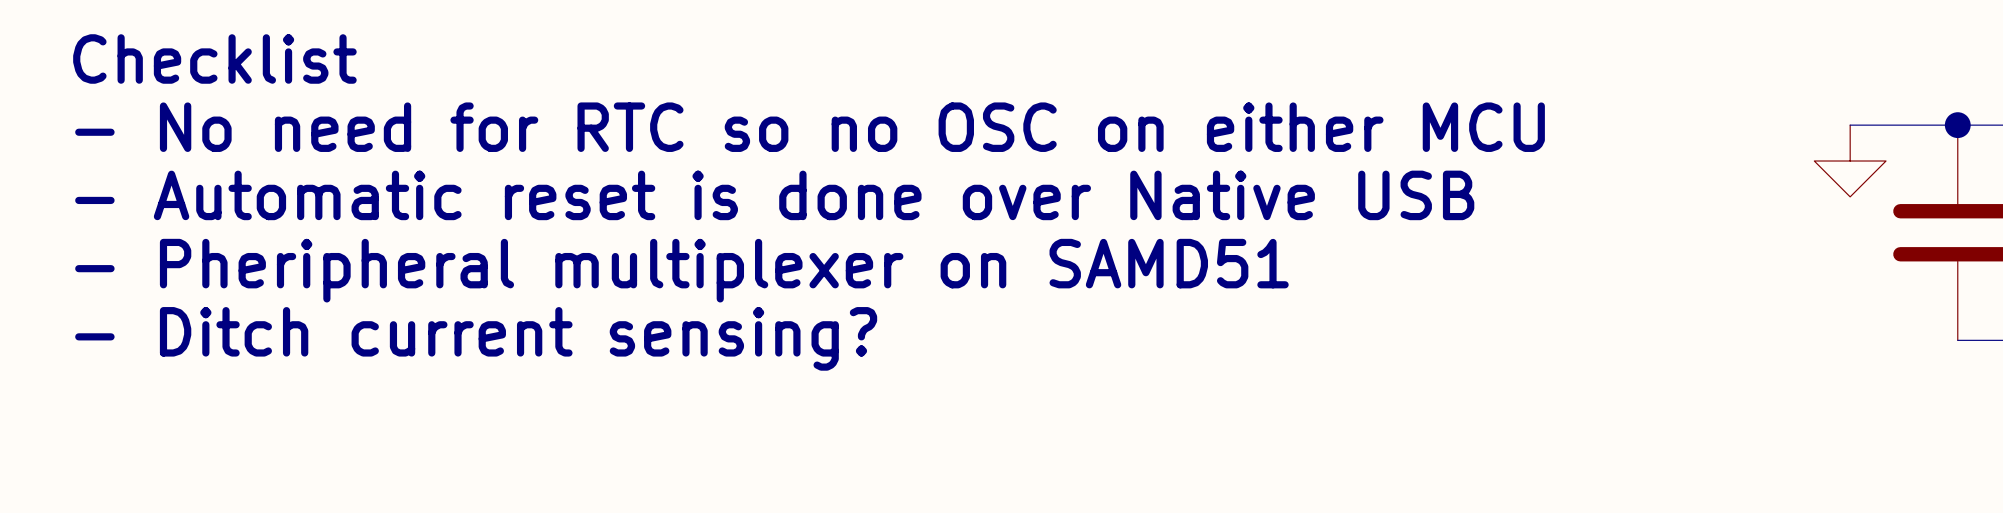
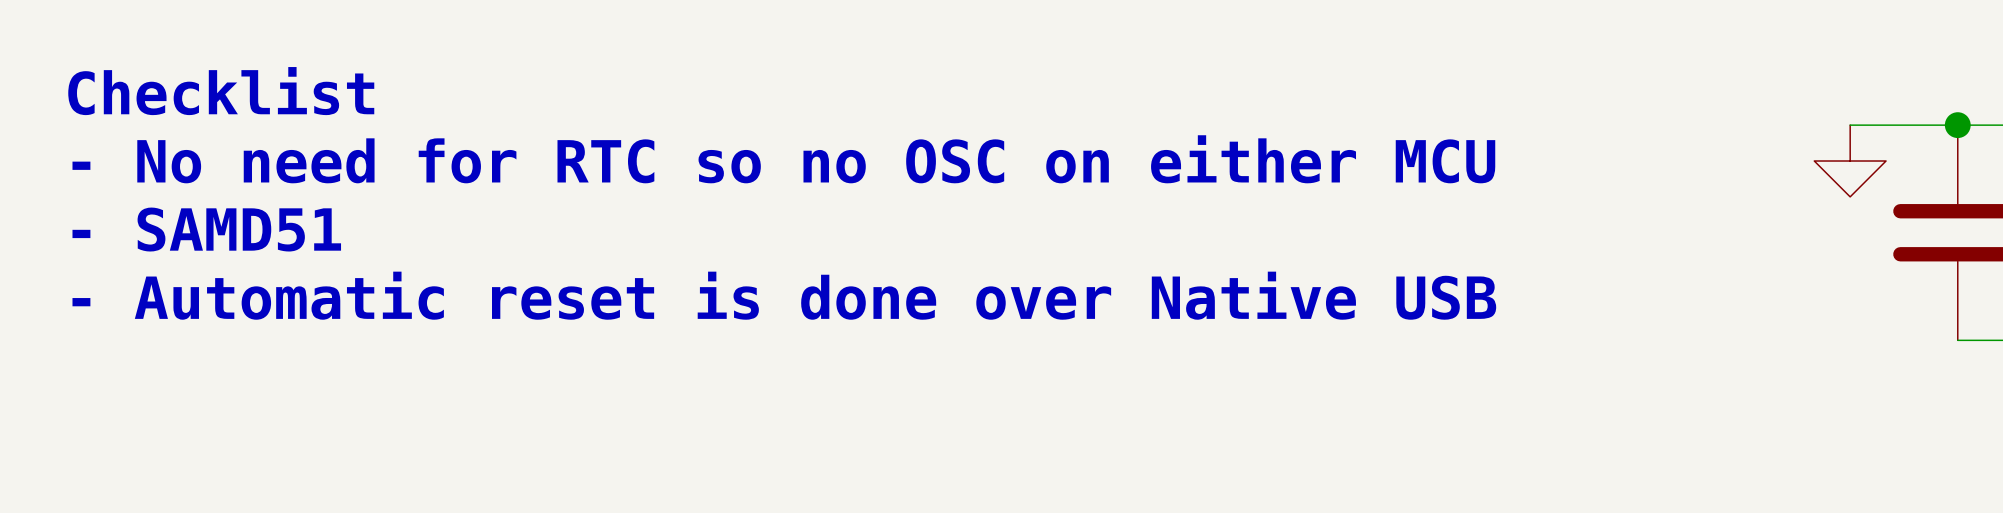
text position: Checklist (214, 58) -> Checklist (221, 91)
text position: - No need for RTC so no OSC on either MCU (810, 127) -> - No need for RTC so no OSC on either MCU (783, 159)
text position: - Automatic reset is done over Native USB (774, 195) -> - Automatic reset is done over Native USB (784, 295)
text: none -> - SAMD51 (206, 229)
text: - Pheripheral multiplexer on SAMD51 (681, 270) -> none
text: - Ditch current sensing? (476, 338) -> none

